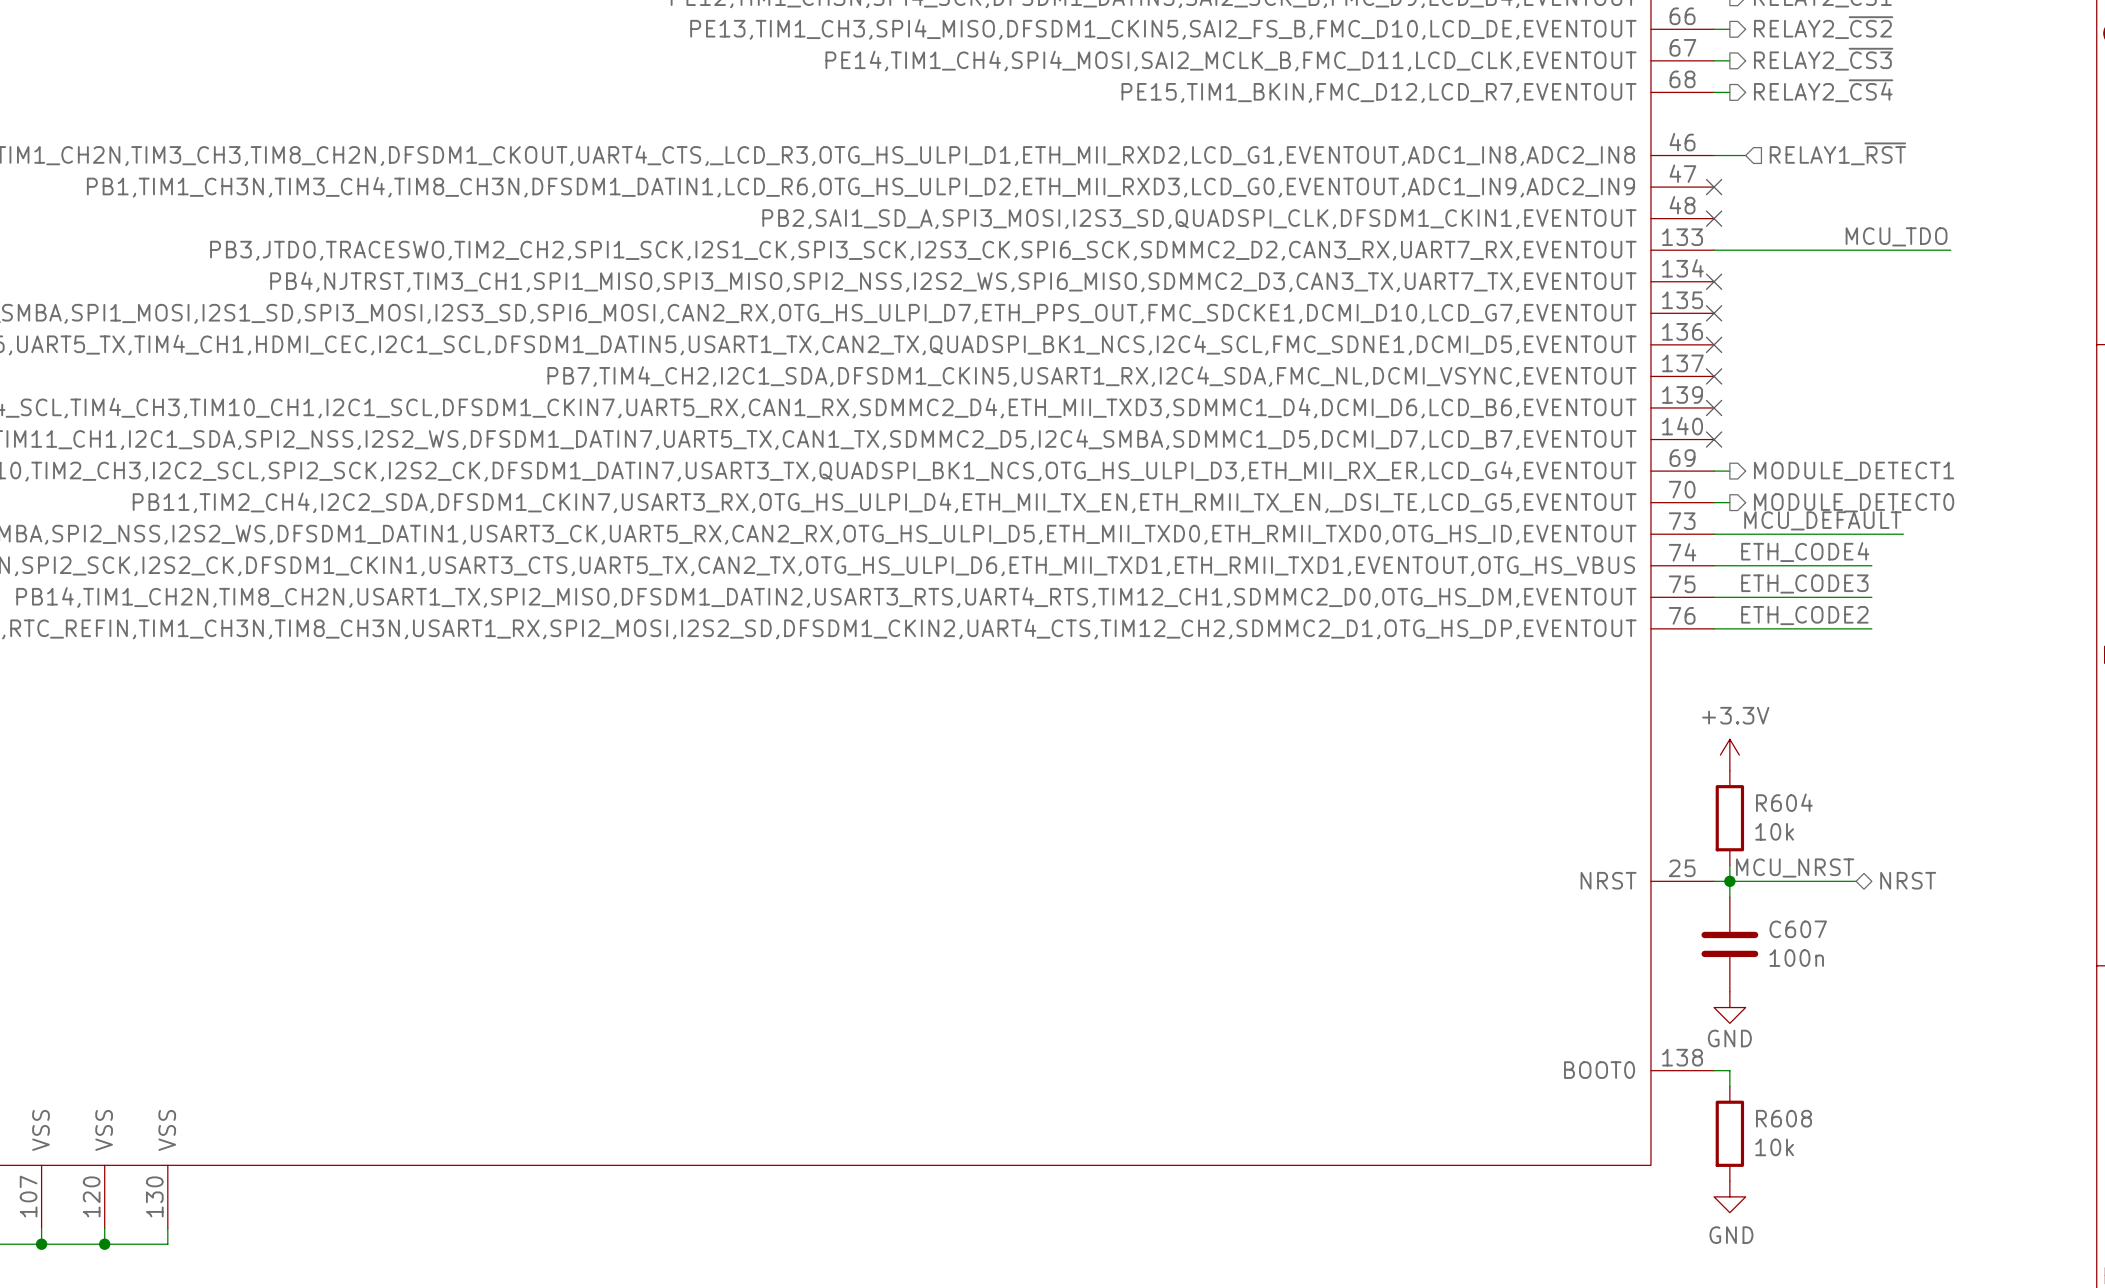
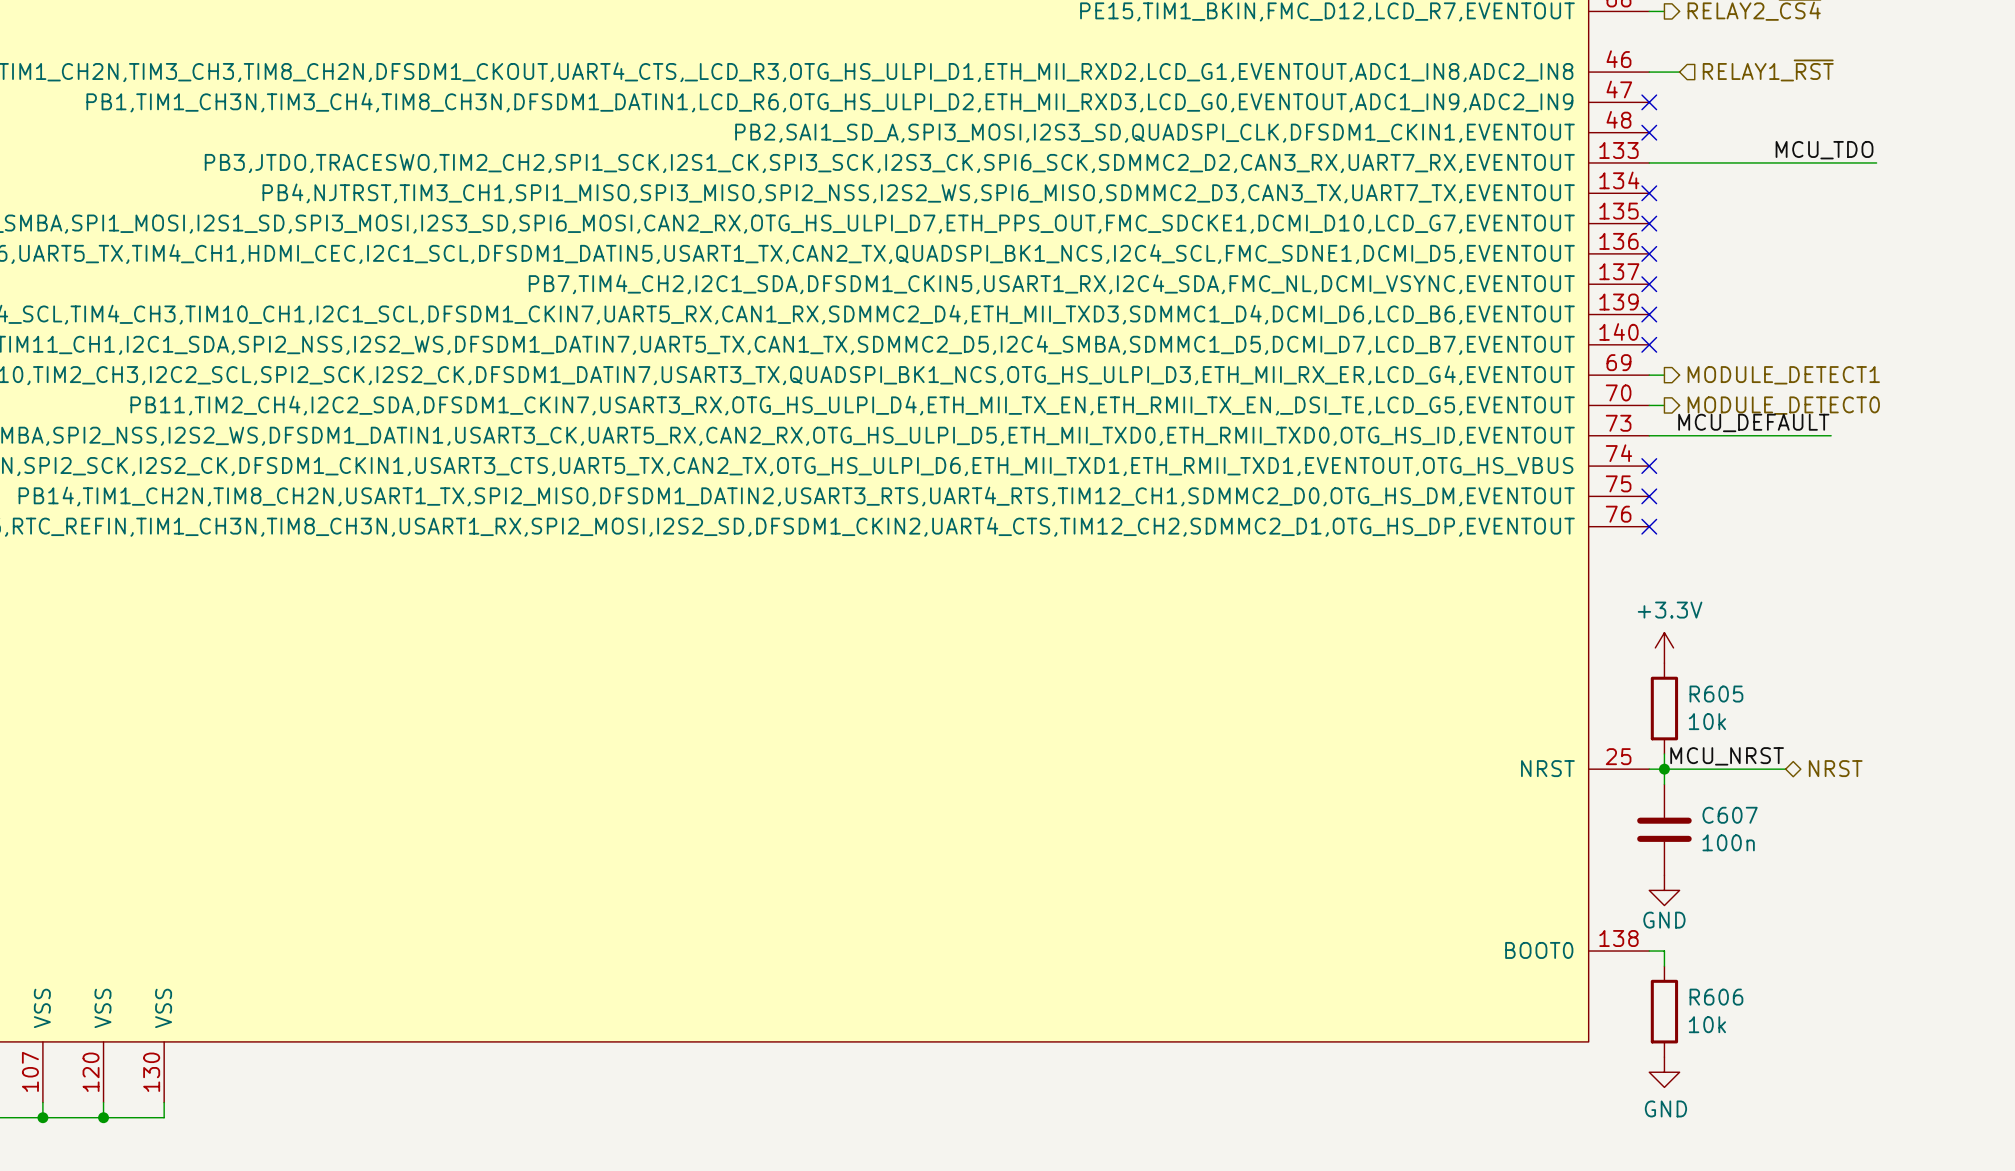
label: ETH_CODE4 (1805, 552) -> none
wire: (1714, 565) (1871, 565) -> none
no-connect mark: none -> (1649, 466)
label: ETH_CODE3 (1804, 583) -> none
wire: (1714, 597) (1871, 597) -> none
no-connect mark: none -> (1649, 496)
label: ETH_CODE2 (1804, 615) -> none
wire: (1714, 628) (1871, 628) -> none
no-connect mark: none -> (1649, 526)
R604 name: R604 (1784, 802) -> R605 (1716, 694)
R608 name: R608 (1784, 1118) -> R606 (1716, 997)

